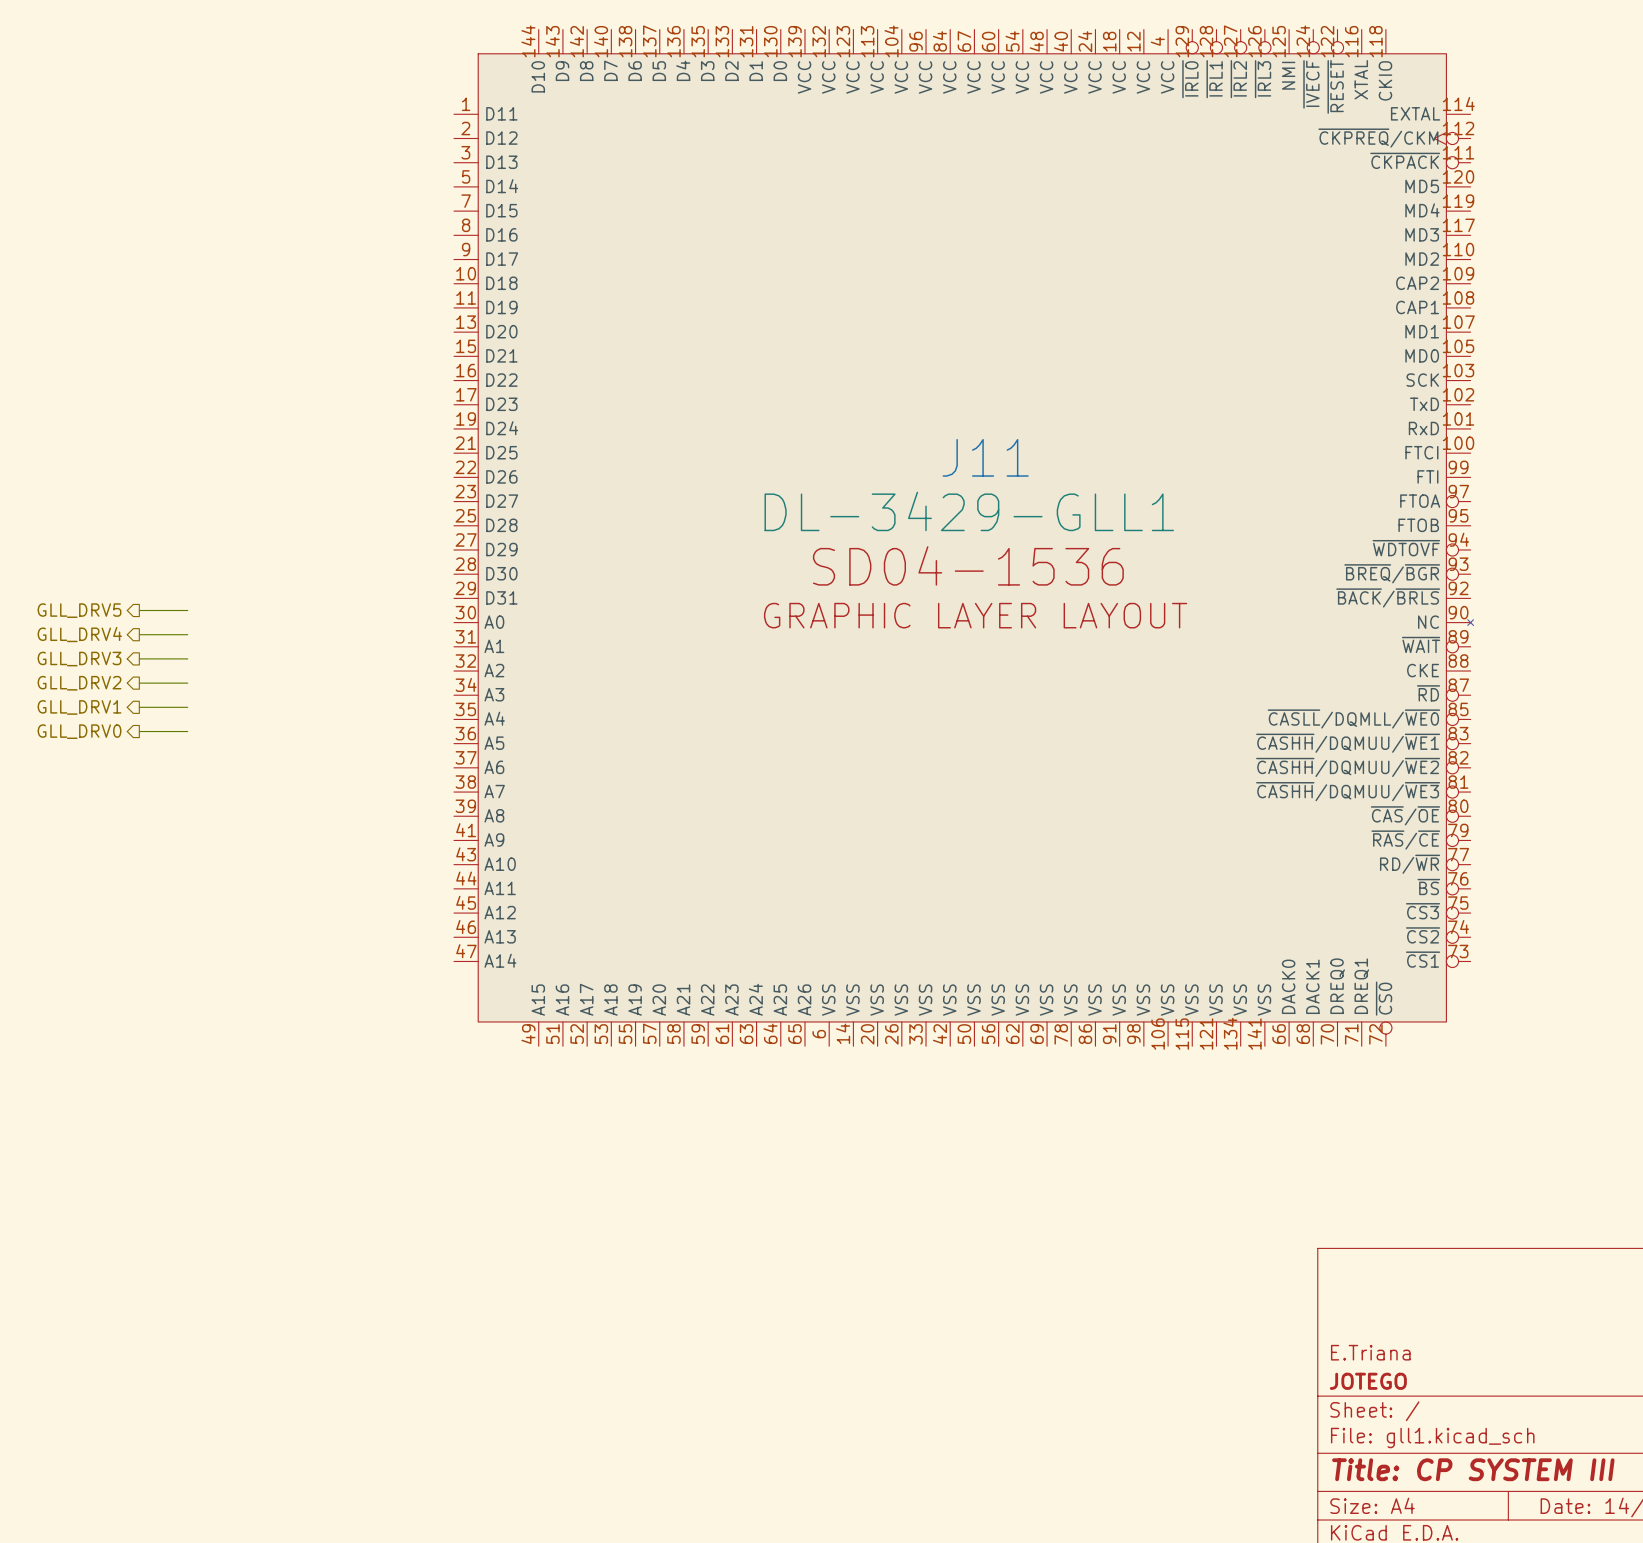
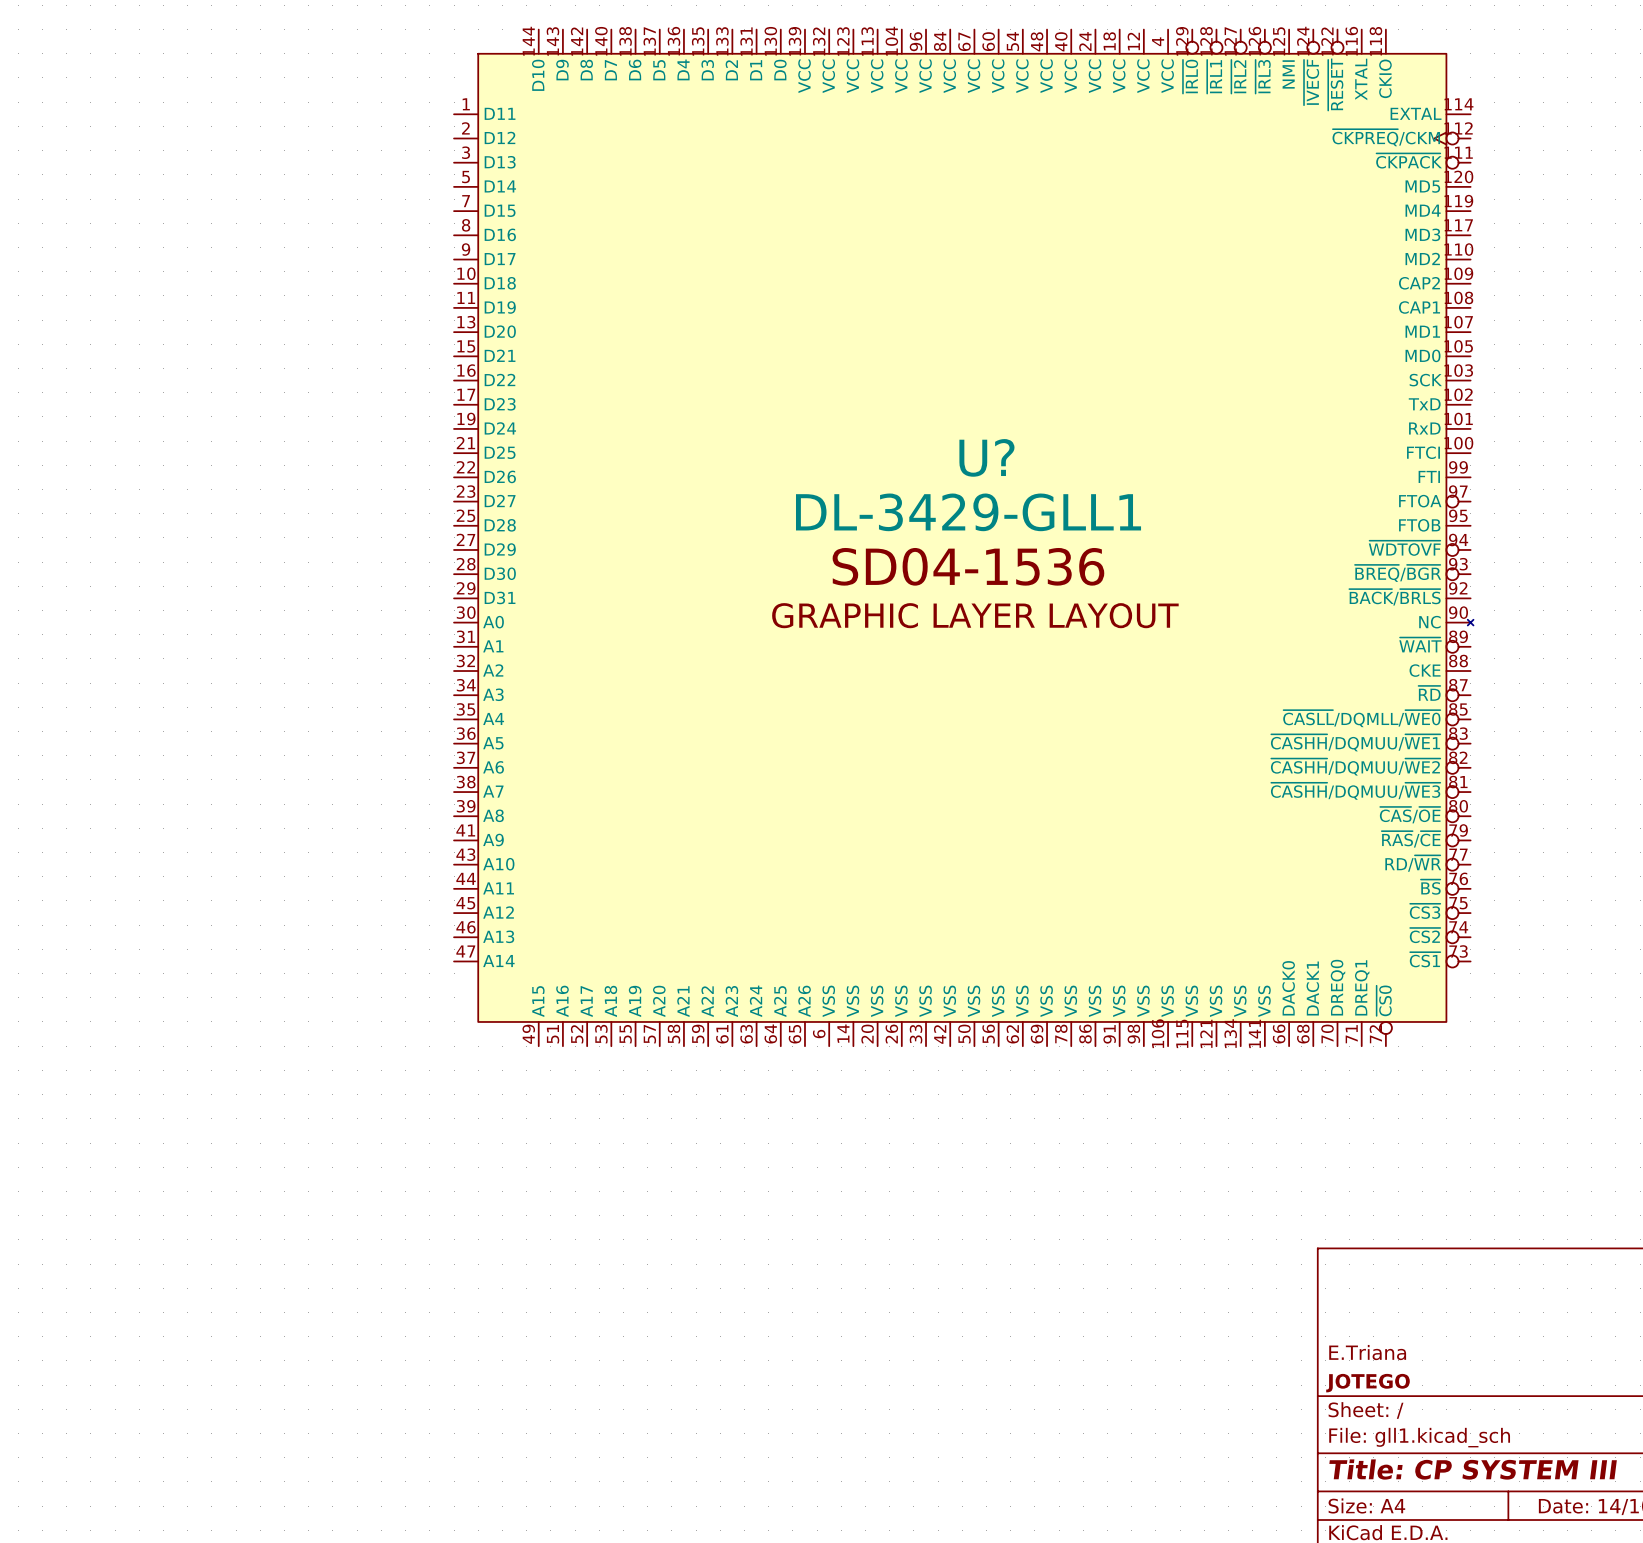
J11 name: J11 (985, 457) -> U? (986, 457)
hierarchical label: GLL_DRV5 (79, 610) -> none
wire: (139, 610) (187, 610) -> none
hierarchical label: GLL_DRV4 (79, 634) -> none
wire: (139, 634) (187, 634) -> none
wire: (139, 658) (187, 658) -> none
hierarchical label: GLL_DRV3 (79, 659) -> none
hierarchical label: GLL_DRV2 (79, 683) -> none
wire: (139, 683) (187, 683) -> none
hierarchical label: GLL_DRV1 (79, 707) -> none
wire: (139, 707) (187, 707) -> none
hierarchical label: GLL_DRV0 (79, 731) -> none
wire: (139, 731) (187, 731) -> none

